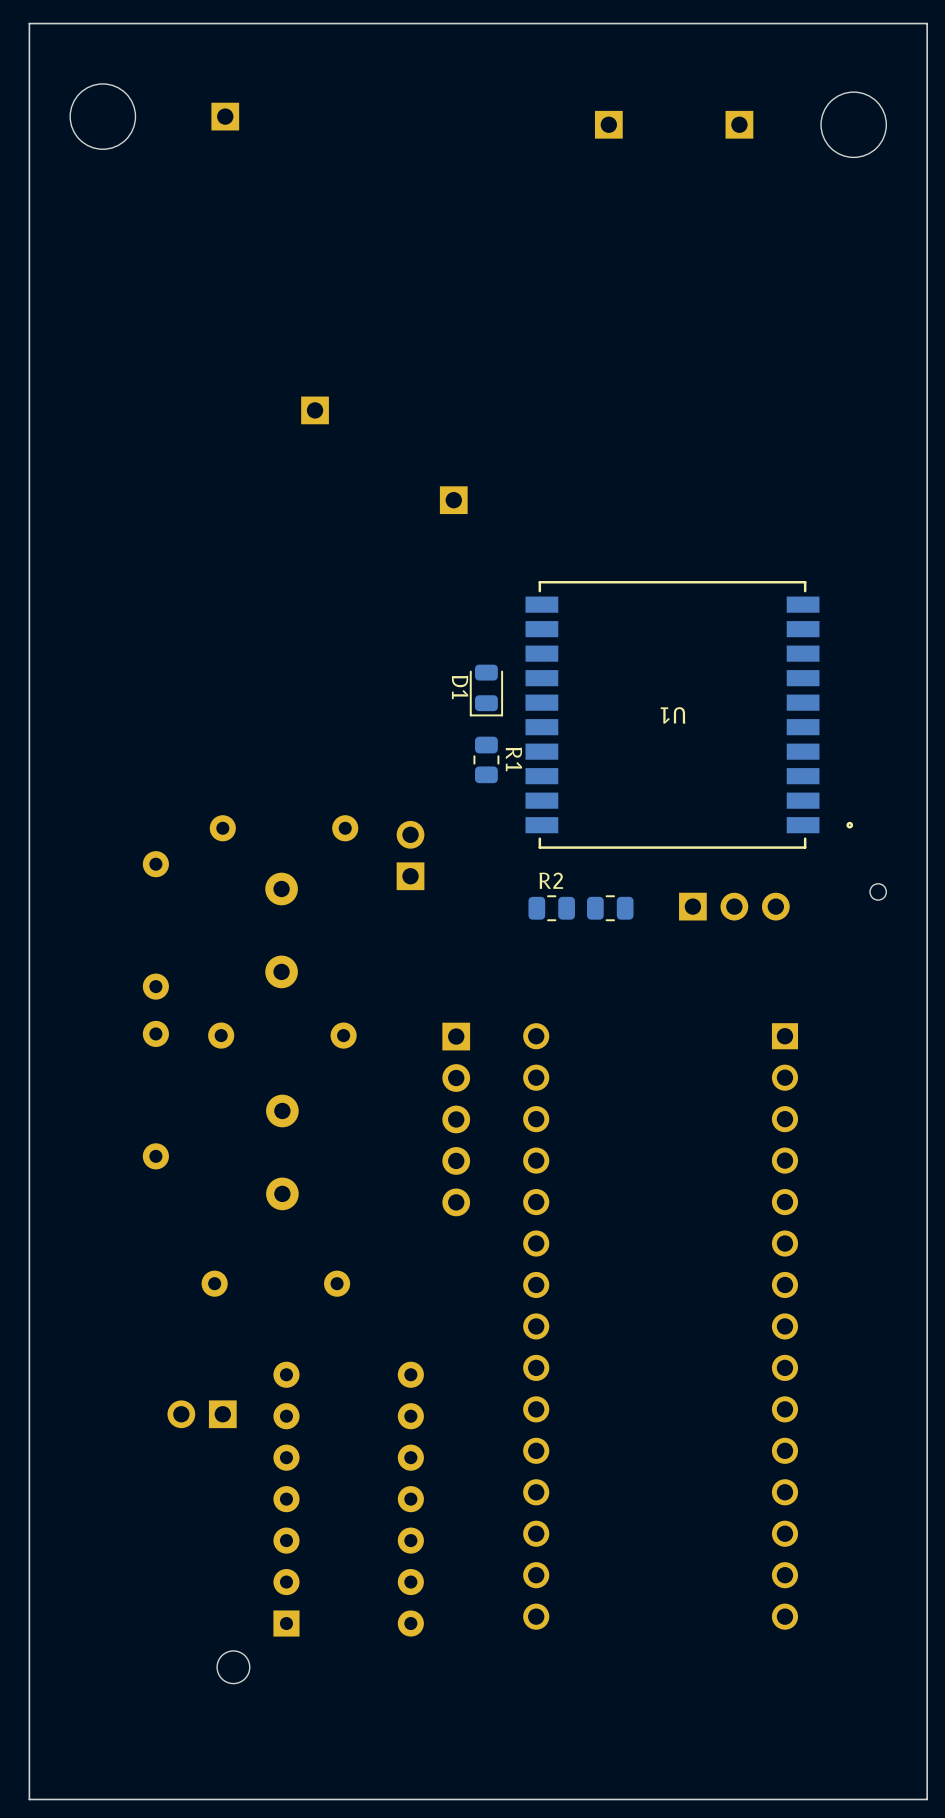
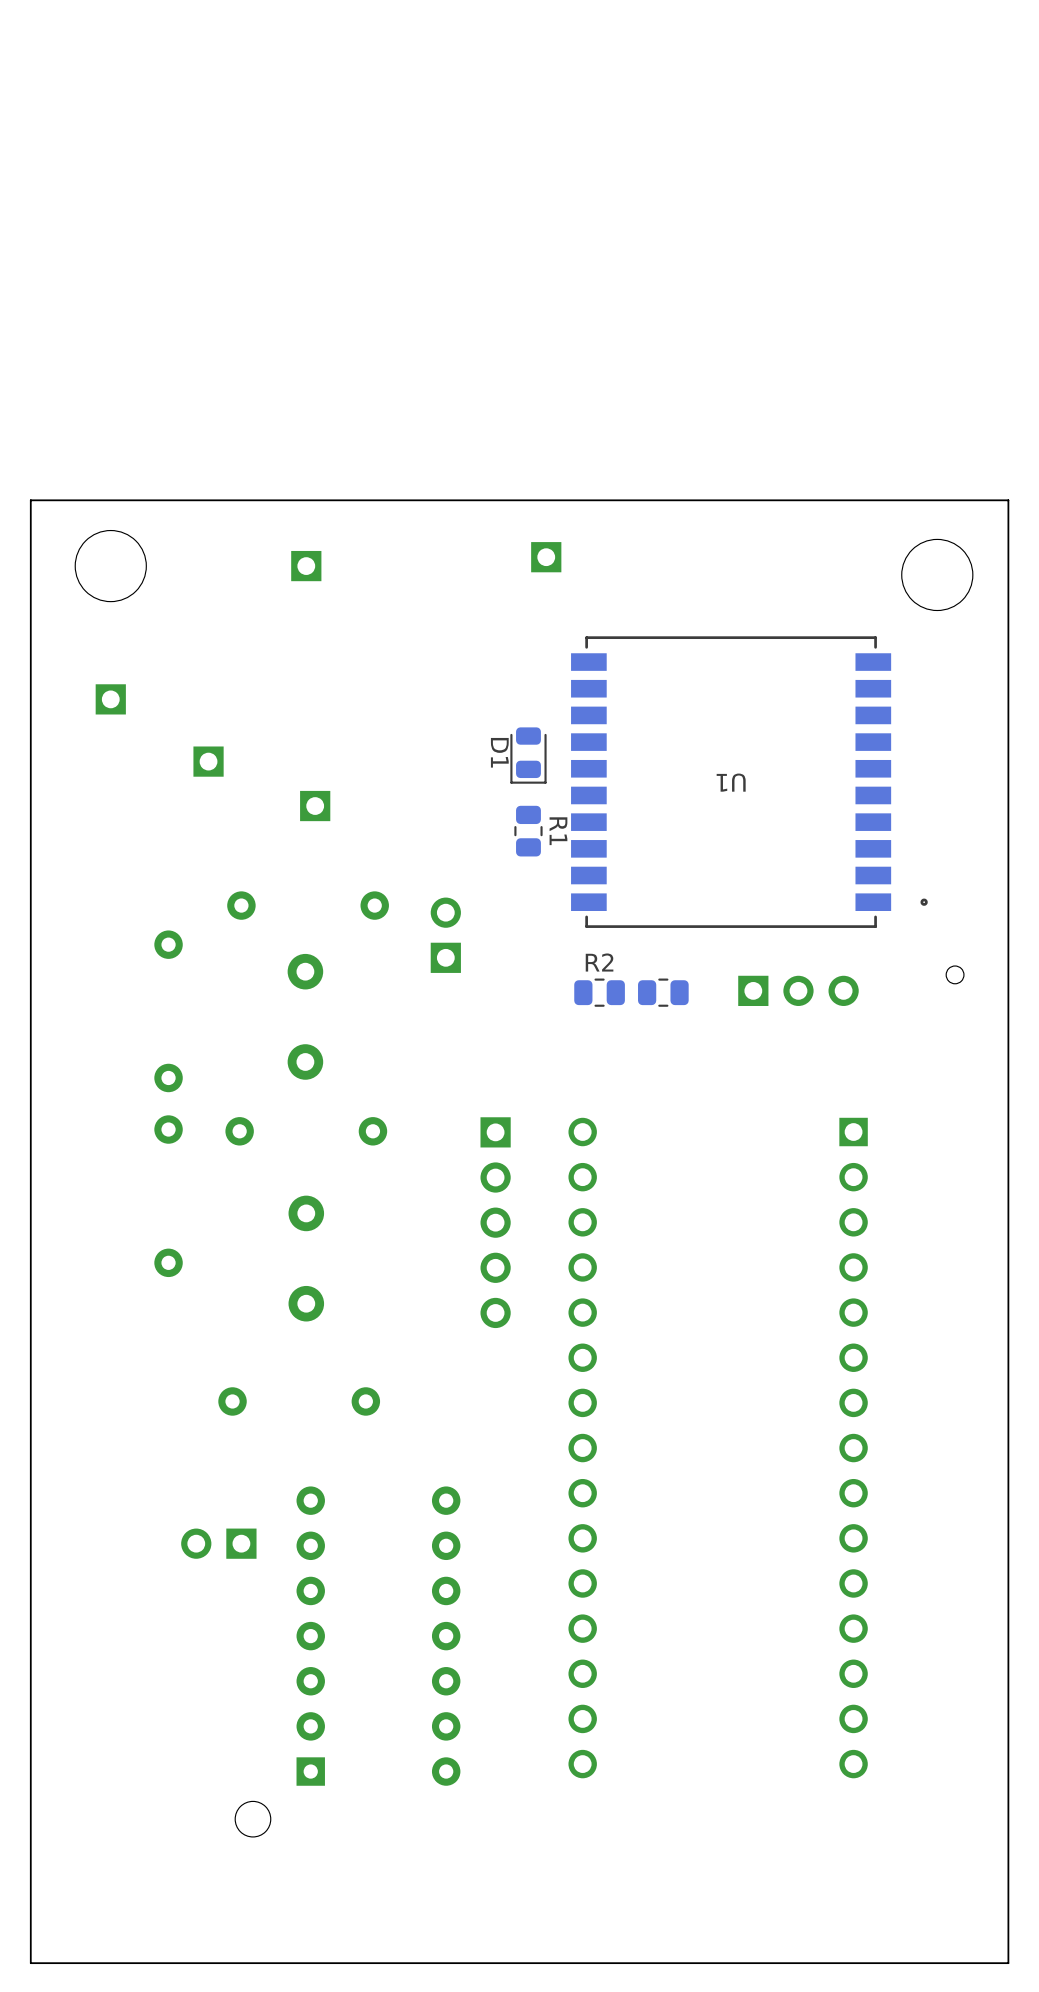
round board edge position: (102, 116) -> (110, 566)
part: (225, 116) -> none
part: (608, 124) -> none
part: (739, 124) -> none
round board edge position: (853, 124) -> (937, 574)
part: (315, 410) -> none
board edge: (927, 456) (927, 23) (29, 23) (29, 456) -> (1008, 500) (30, 500)
part position: (453, 500) -> (546, 557)
part: none -> (306, 566)
part: none -> (110, 699)
part: none -> (208, 761)
part: none -> (315, 806)

